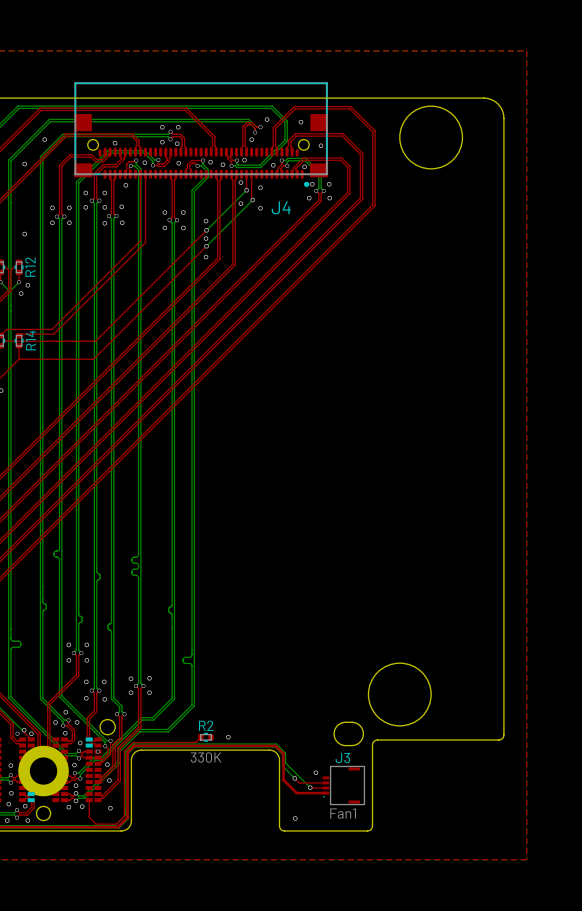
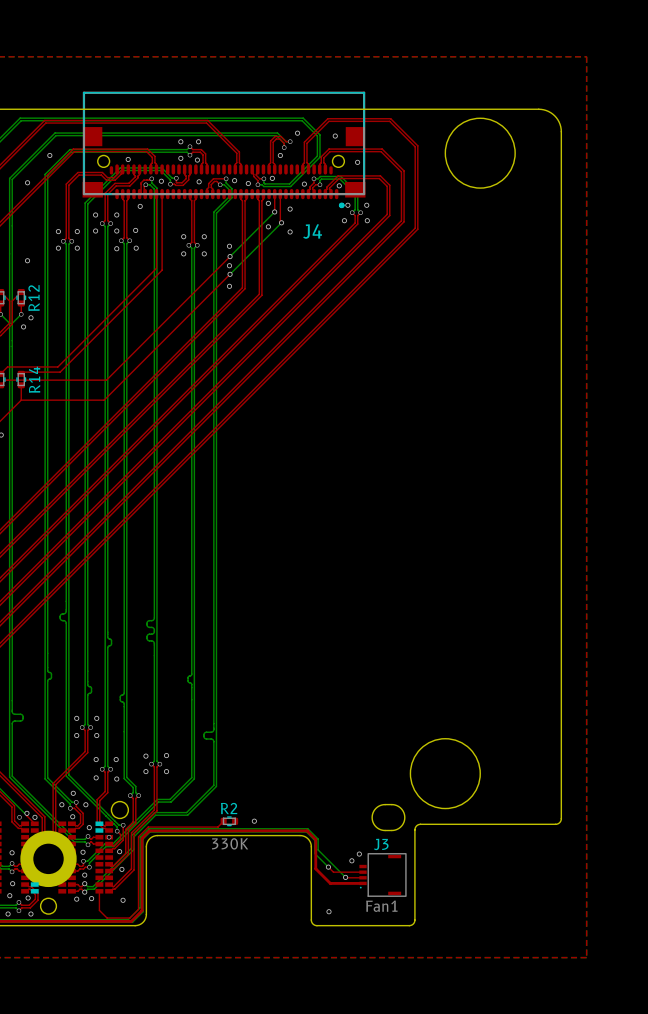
via: none -> (359, 854)

